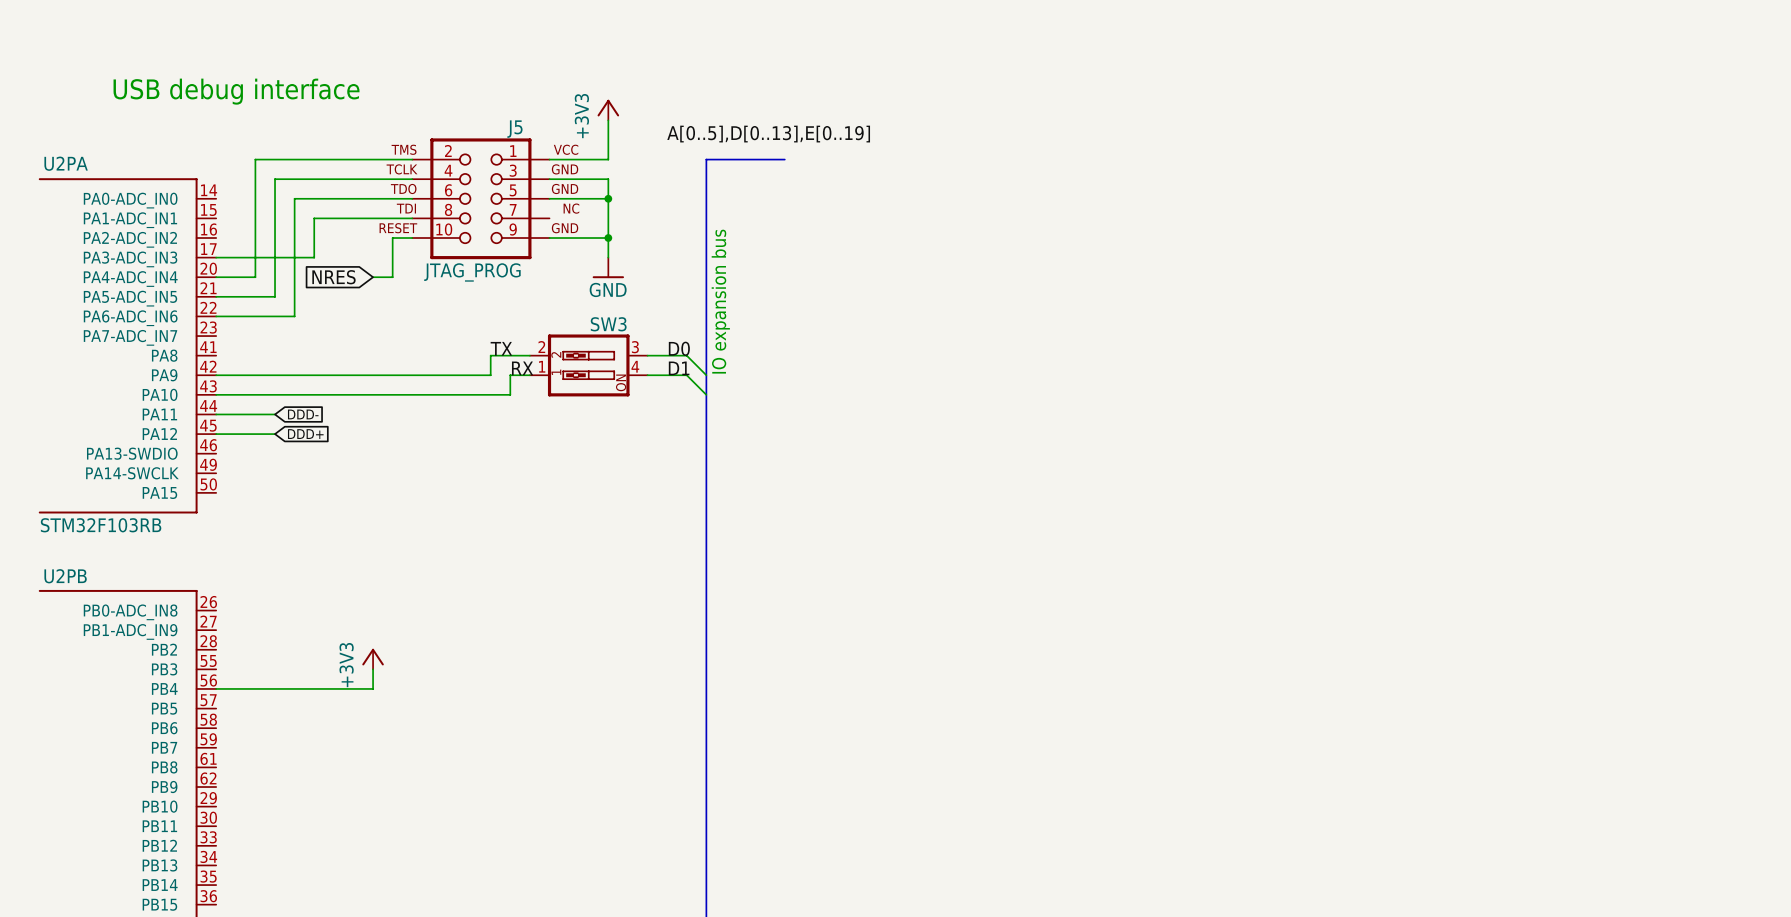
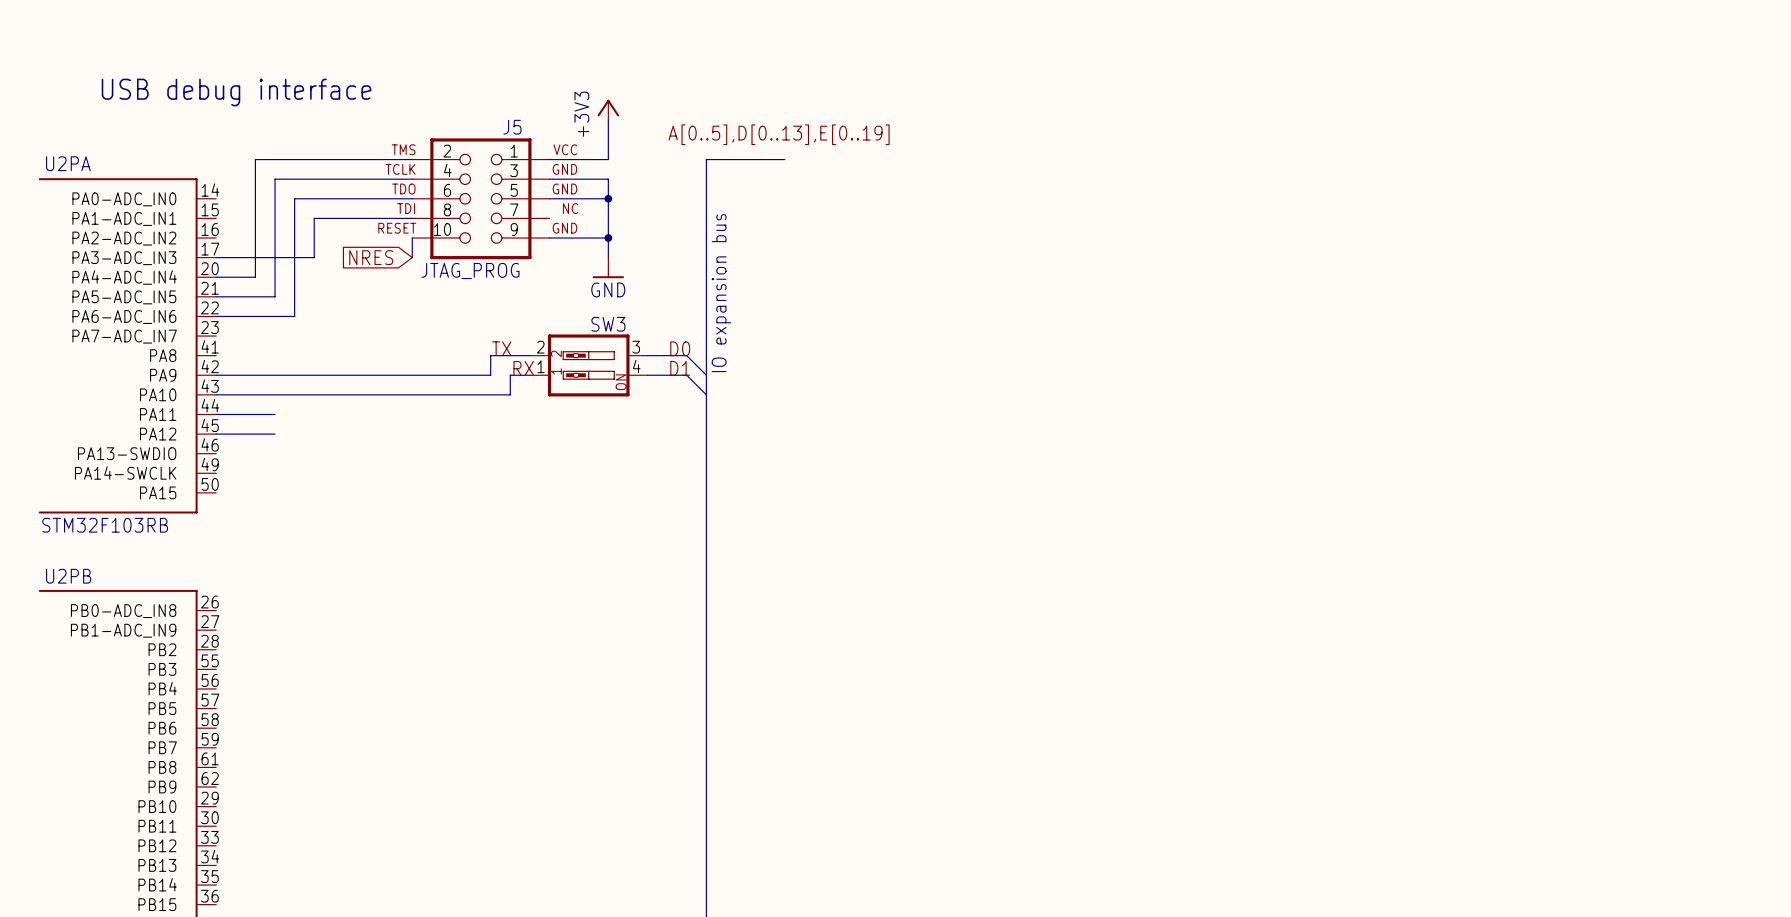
wire: (412, 238) (392, 238) (392, 277) (373, 277) -> (412, 238) (412, 257)
global label position: NRES (333, 277) -> NRES (371, 257)
global label: DDD- (303, 414) -> none
global label: DDD+ (305, 434) -> none
power symbol: +3V3 (373, 659) -> none
wire: (373, 669) (373, 688) (216, 688) -> none

